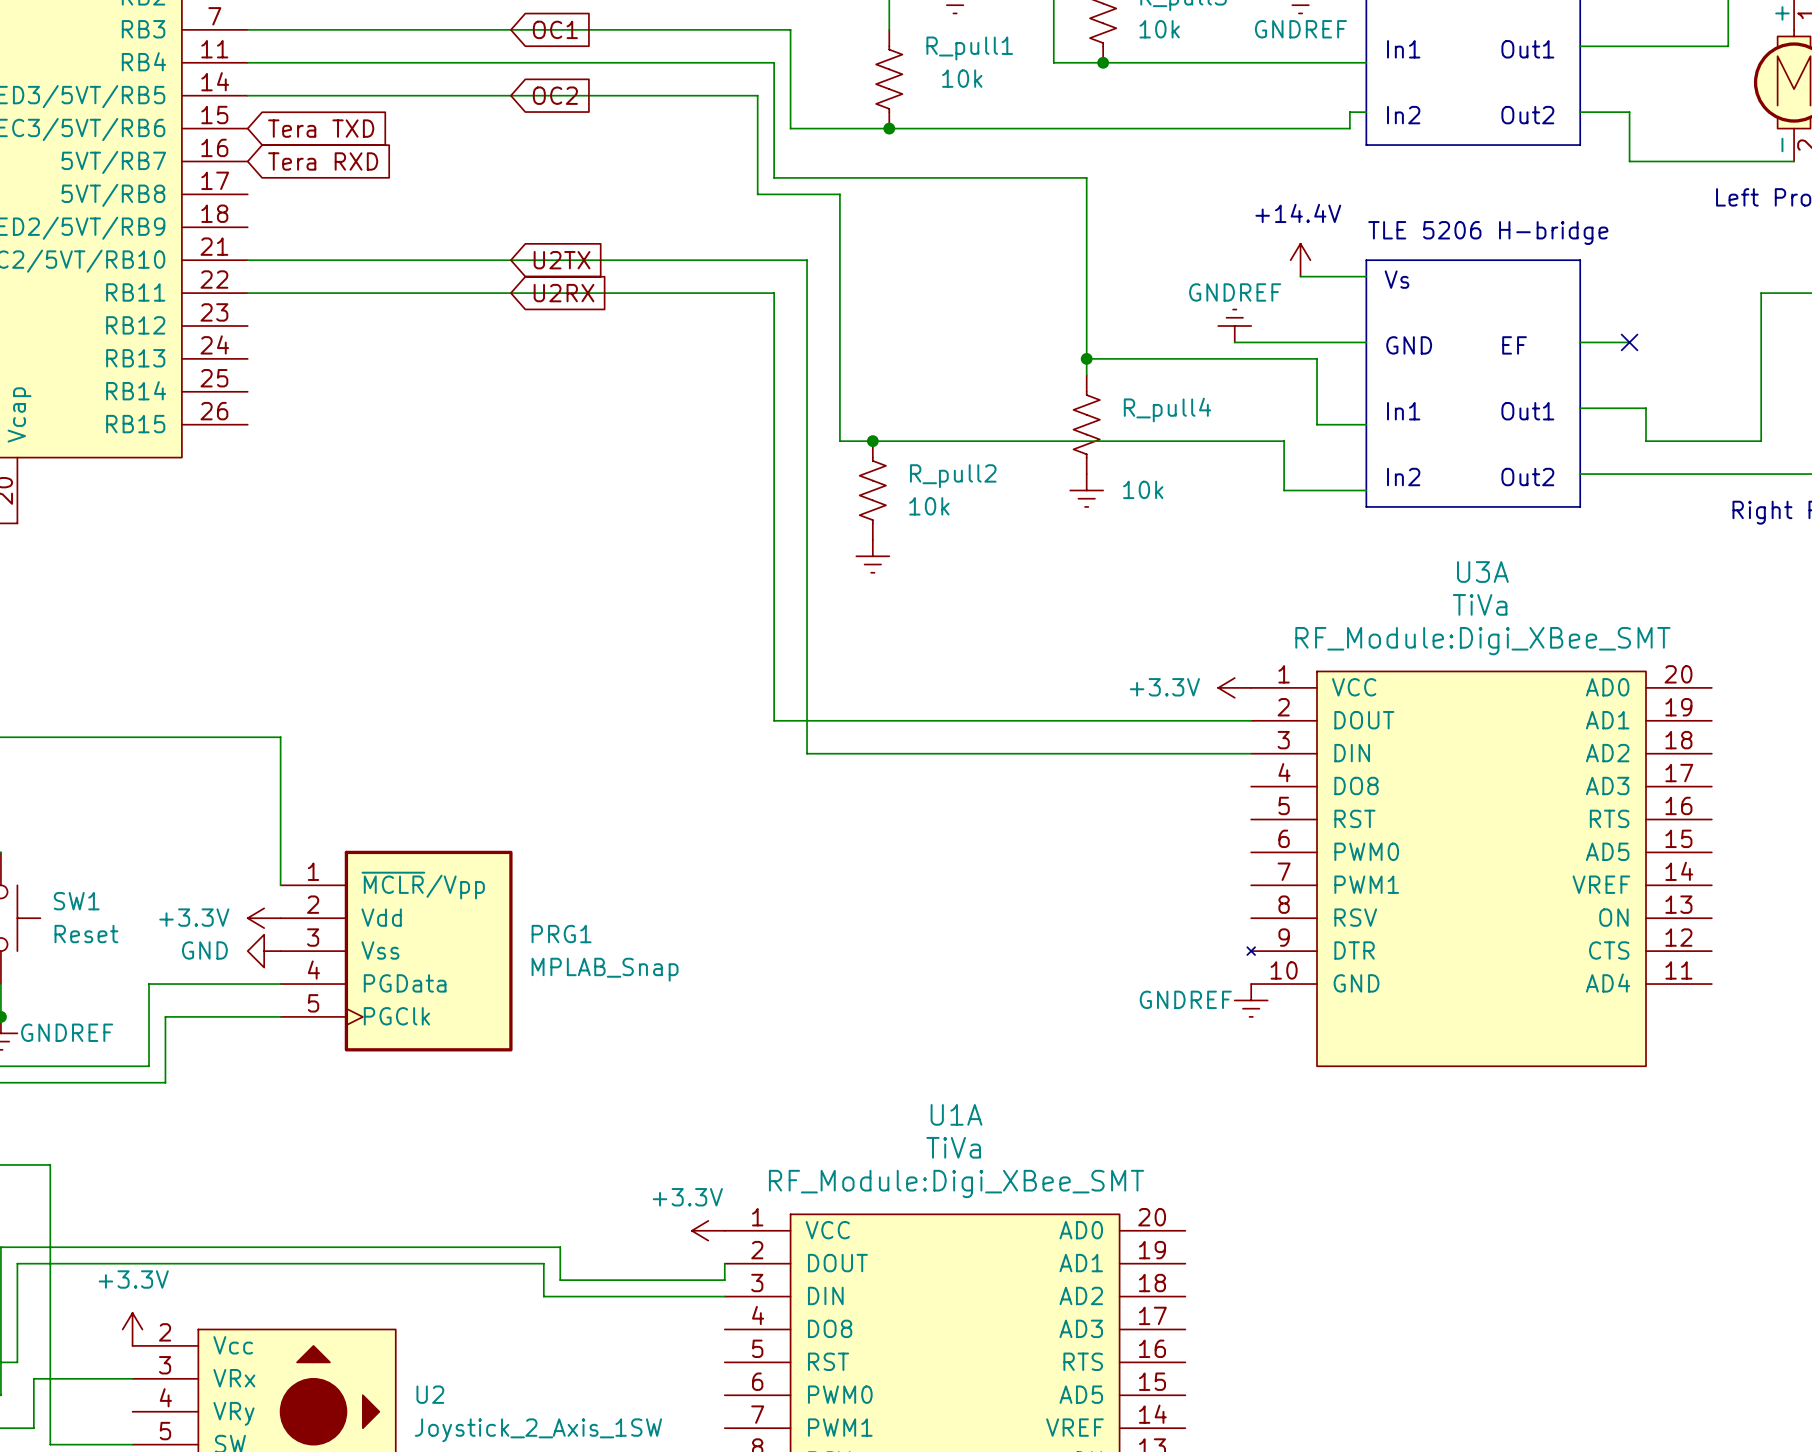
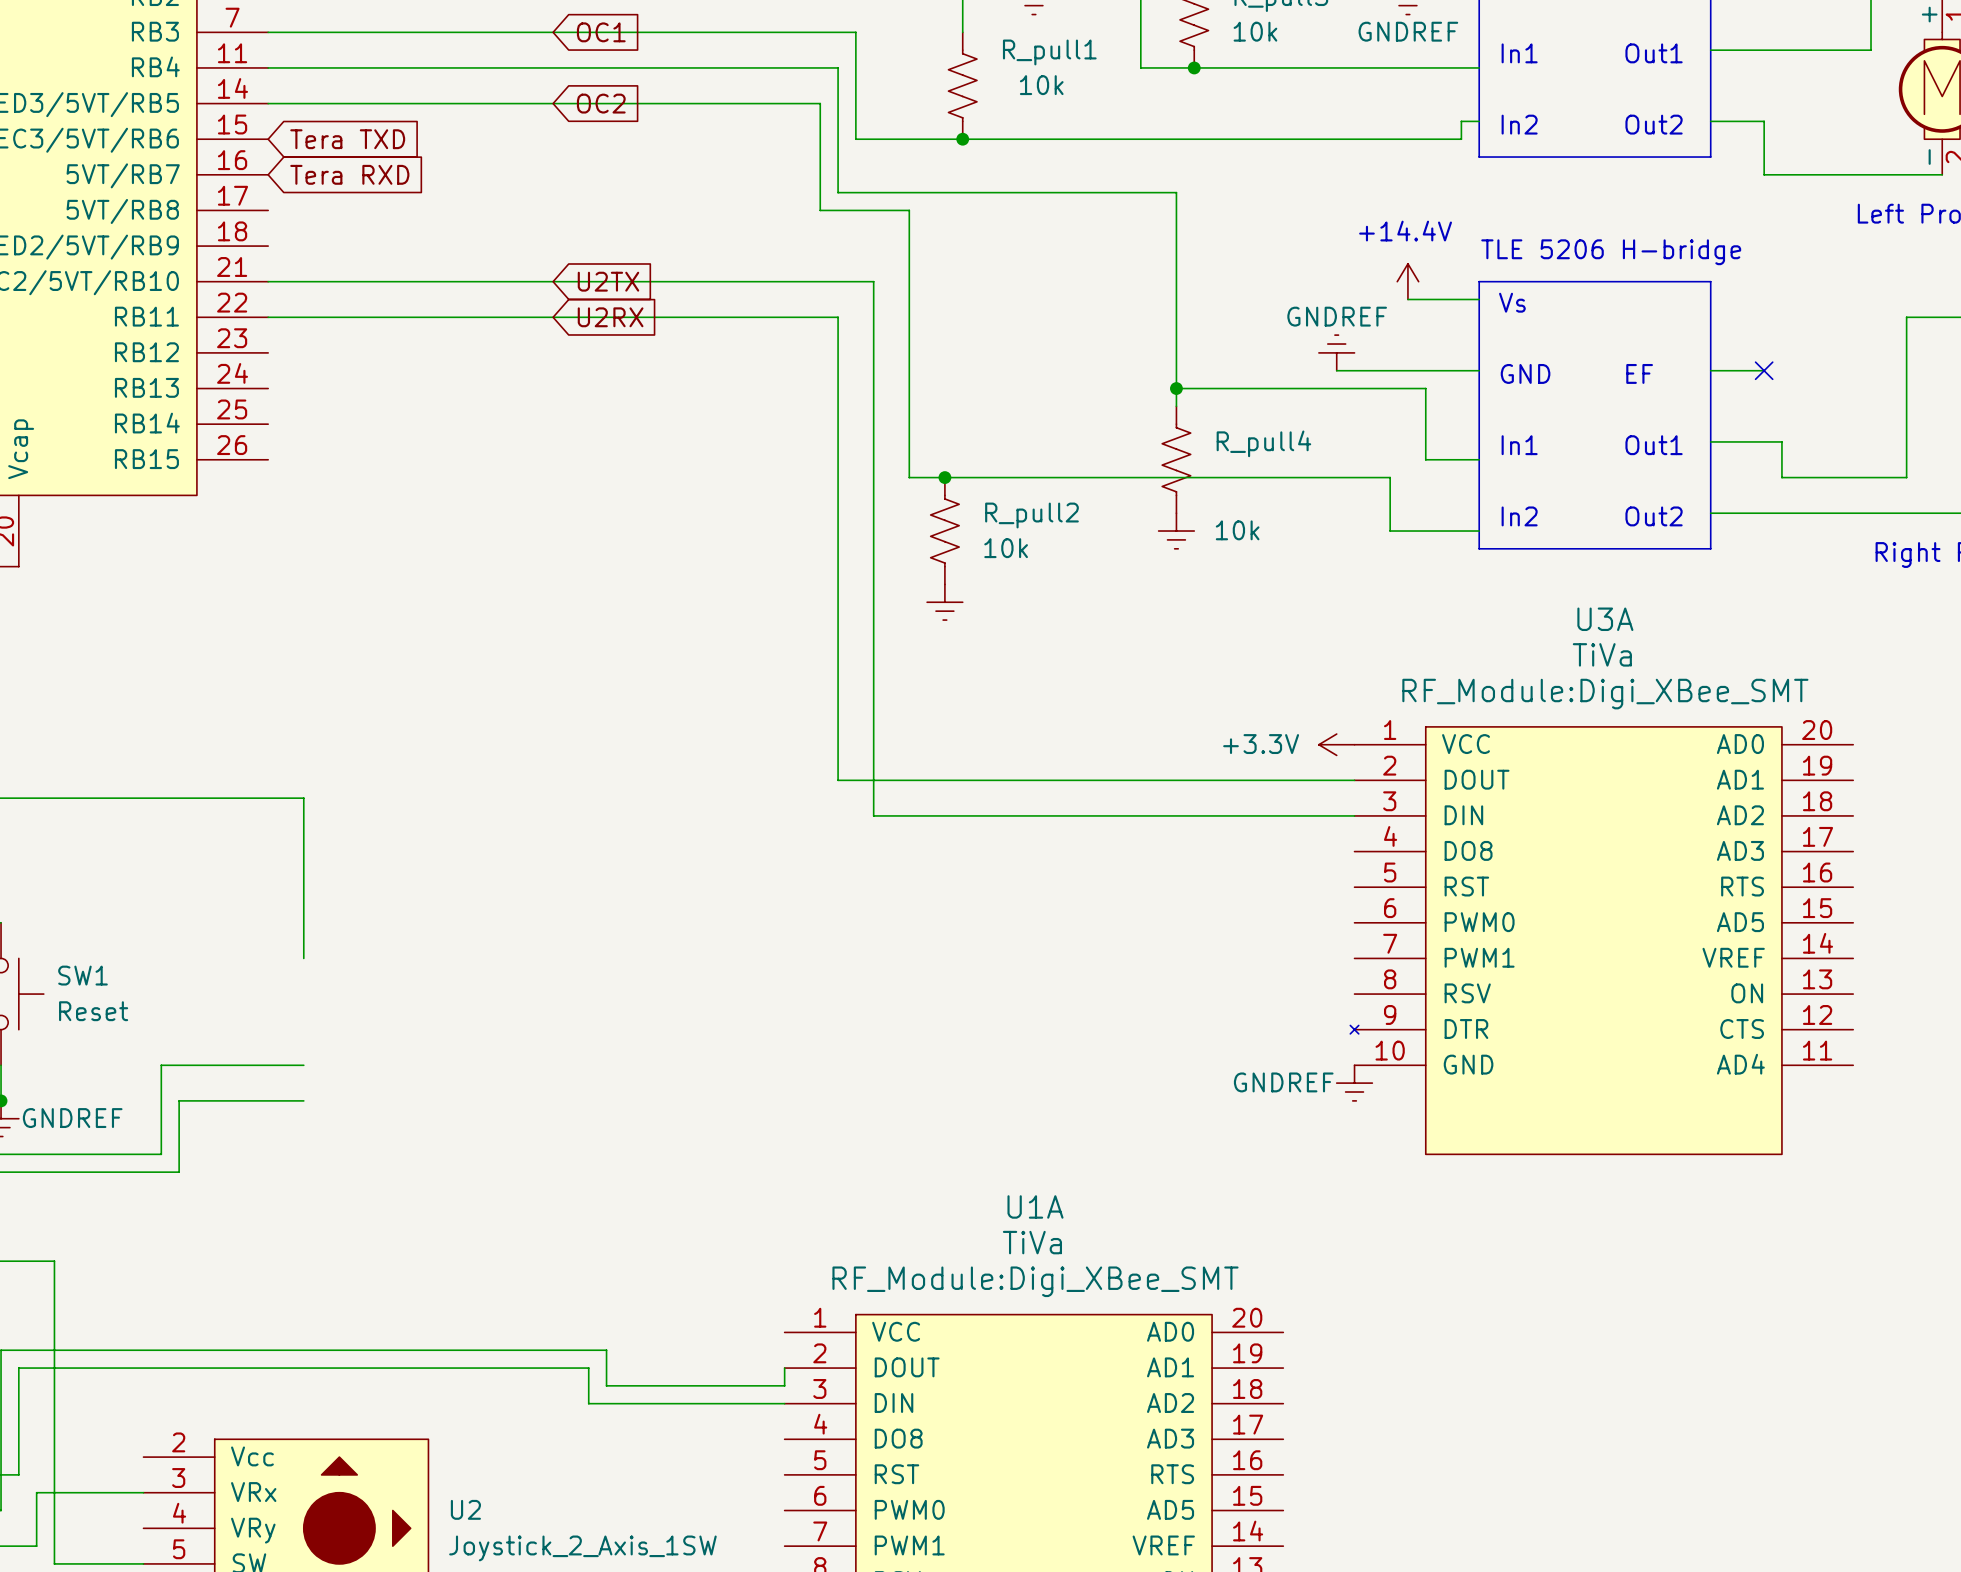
power symbol: +3.3V (264, 918) -> none
power symbol: GND (264, 951) -> none
PRG1: MPLAB_Snap (396, 951) -> none
power symbol: +3.3V (708, 1230) -> none
power symbol: +3.3V (132, 1329) -> none

